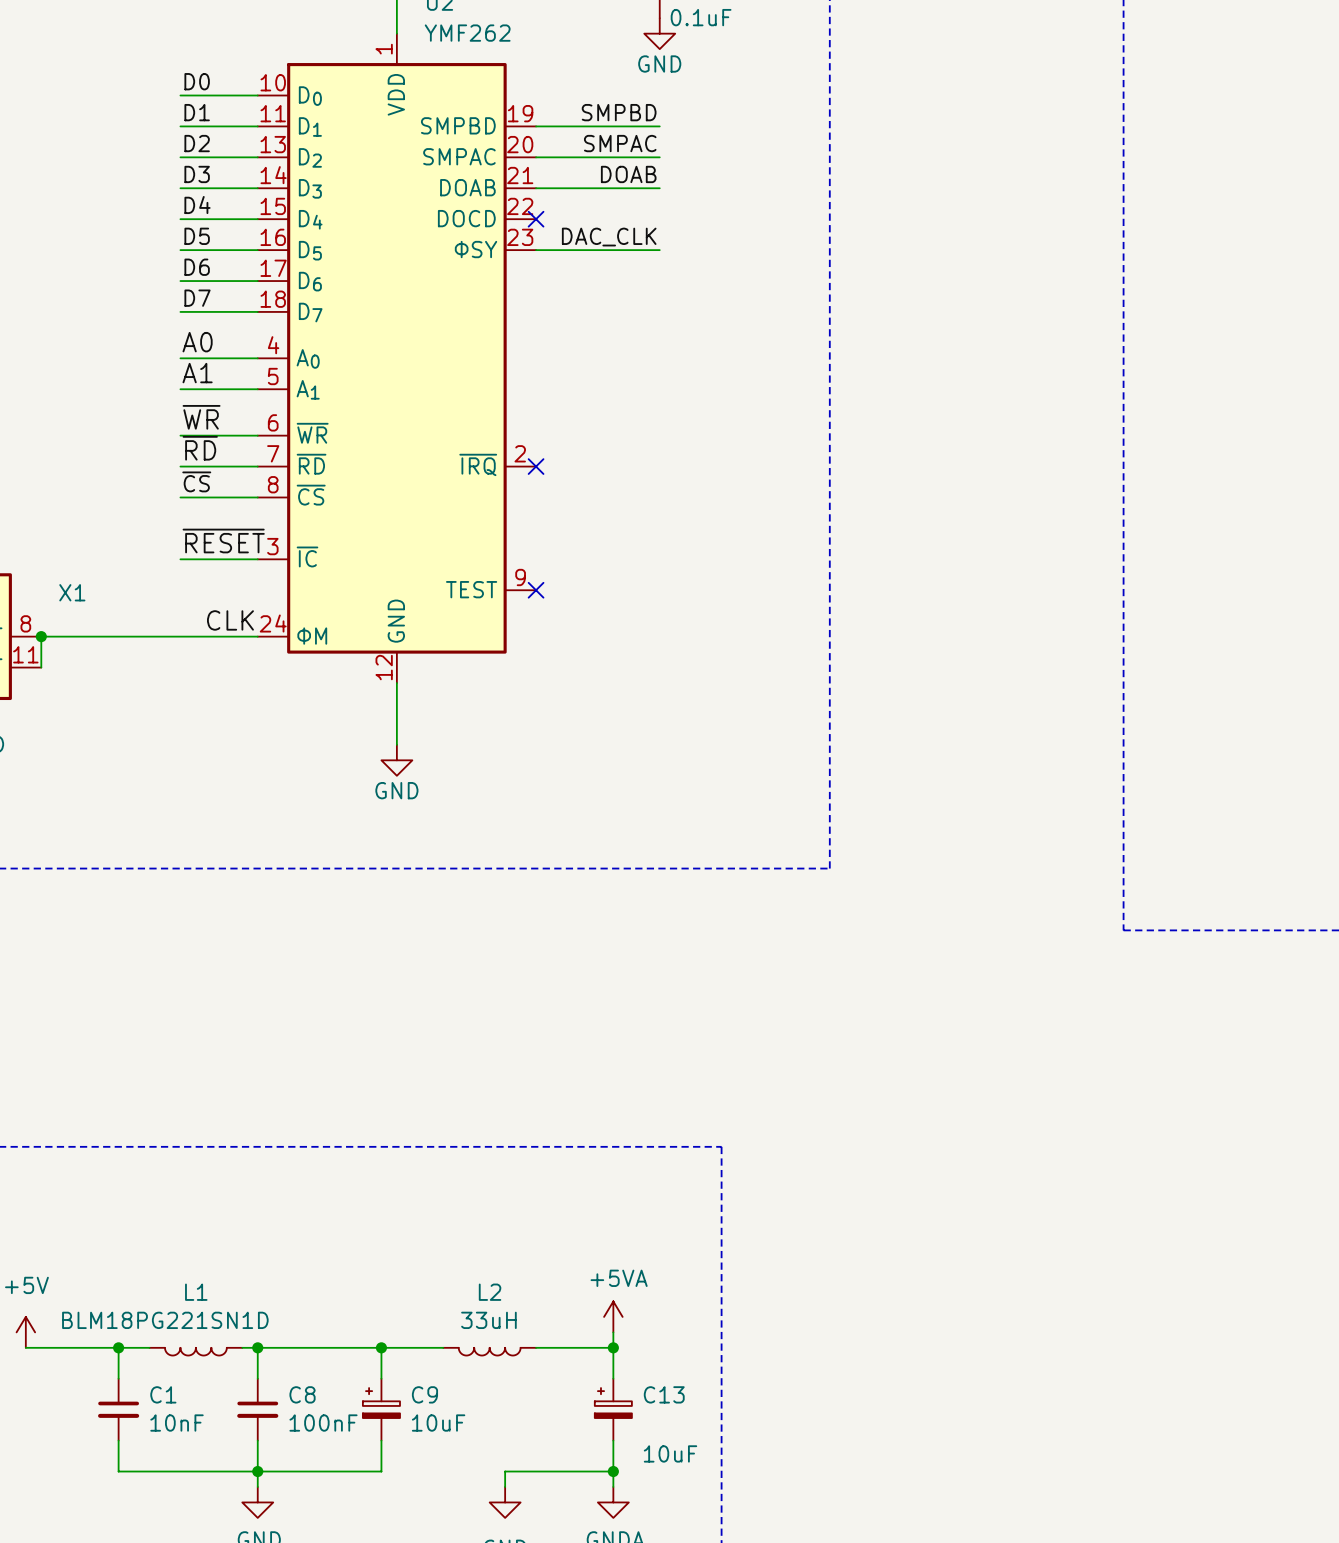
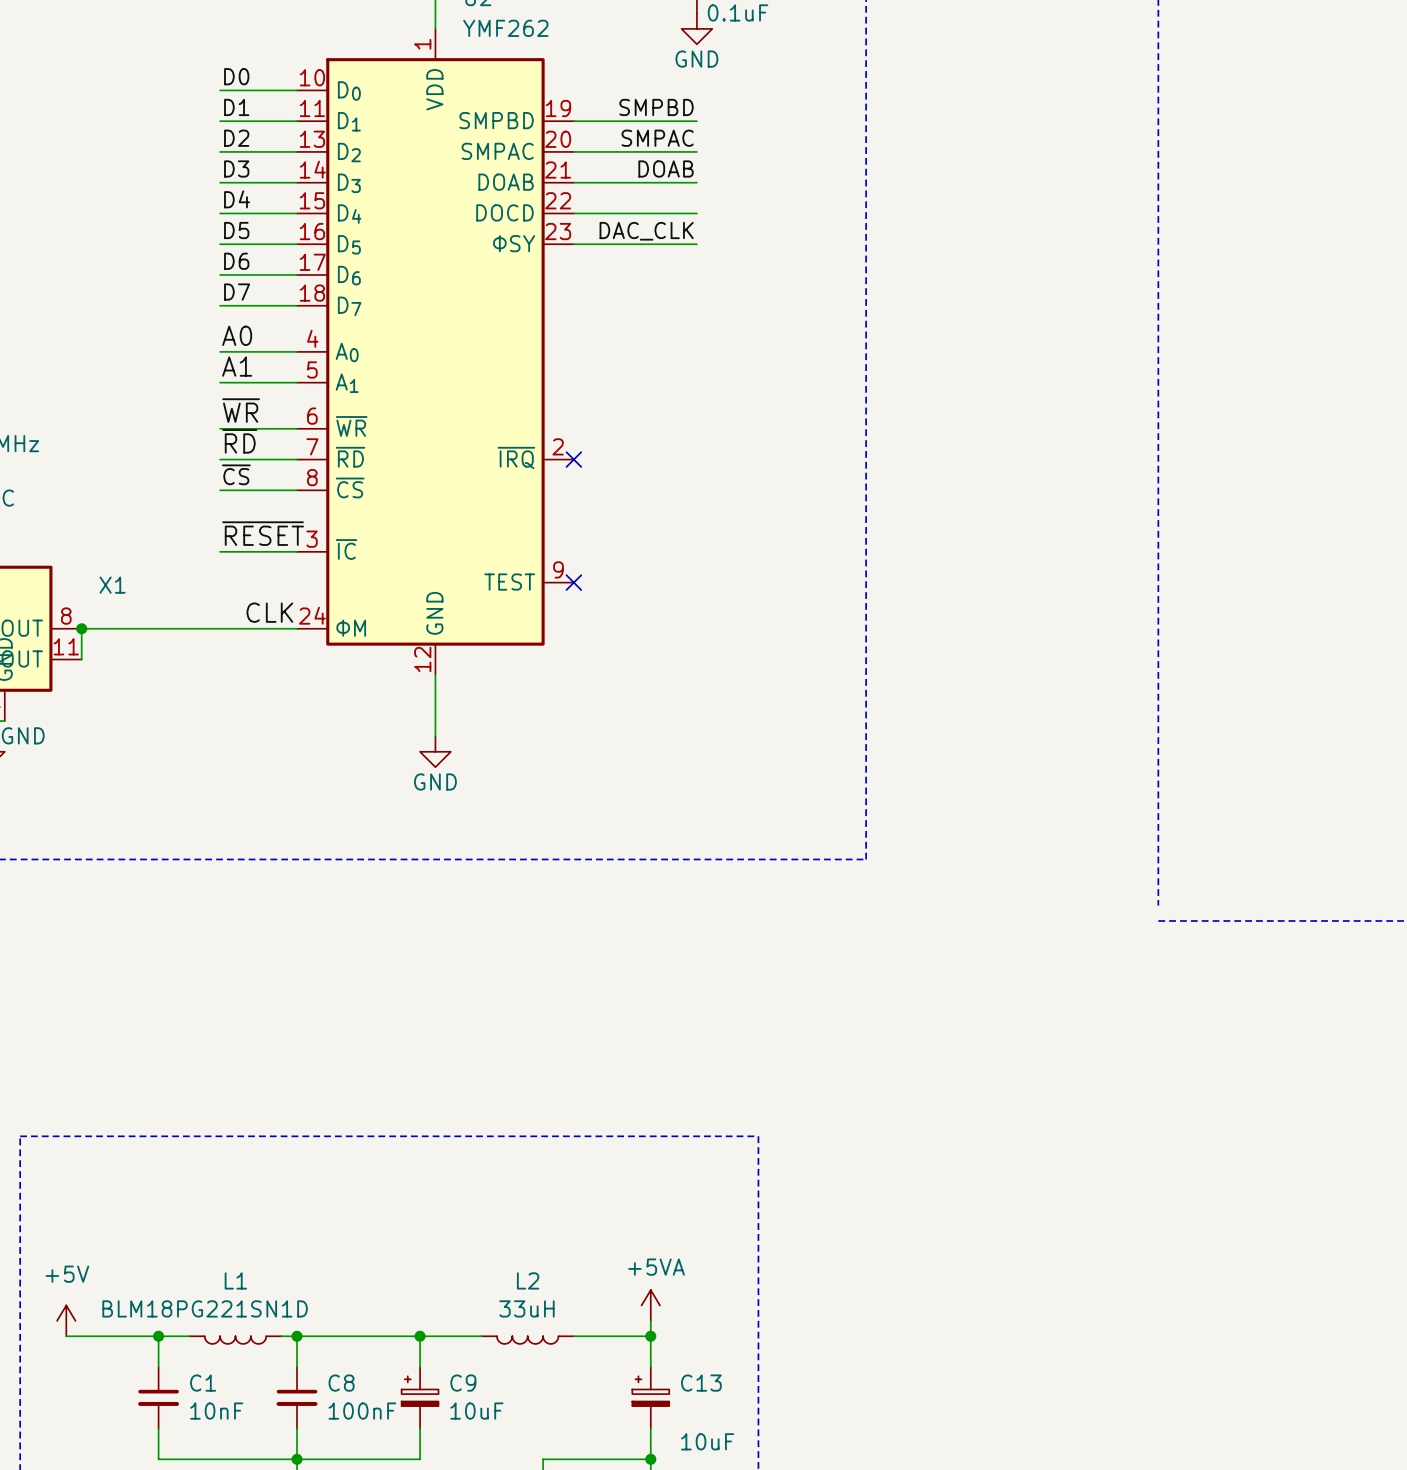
wire: none -> (573, 213) (696, 213)
no-connect mark: (536, 219) -> none
line: (1123, 914) (1123, 930) -> none

